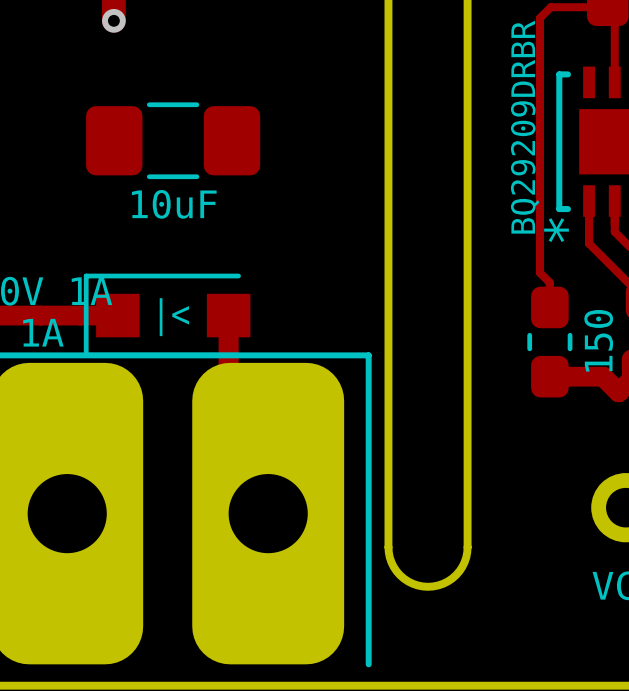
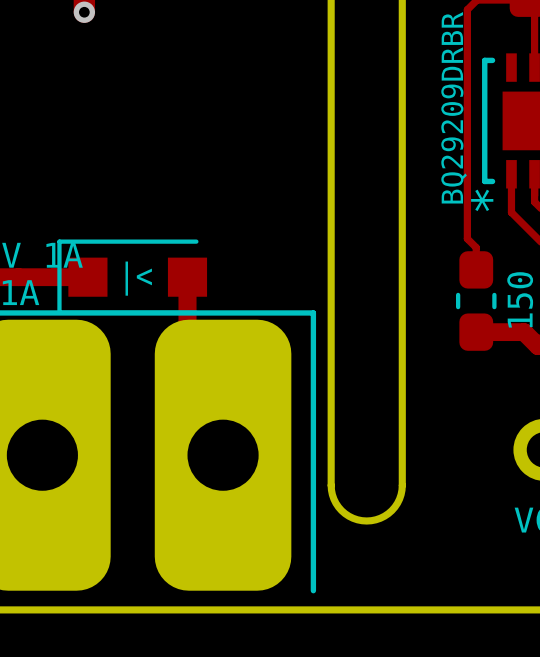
part: 10uF (173, 140) -> none

